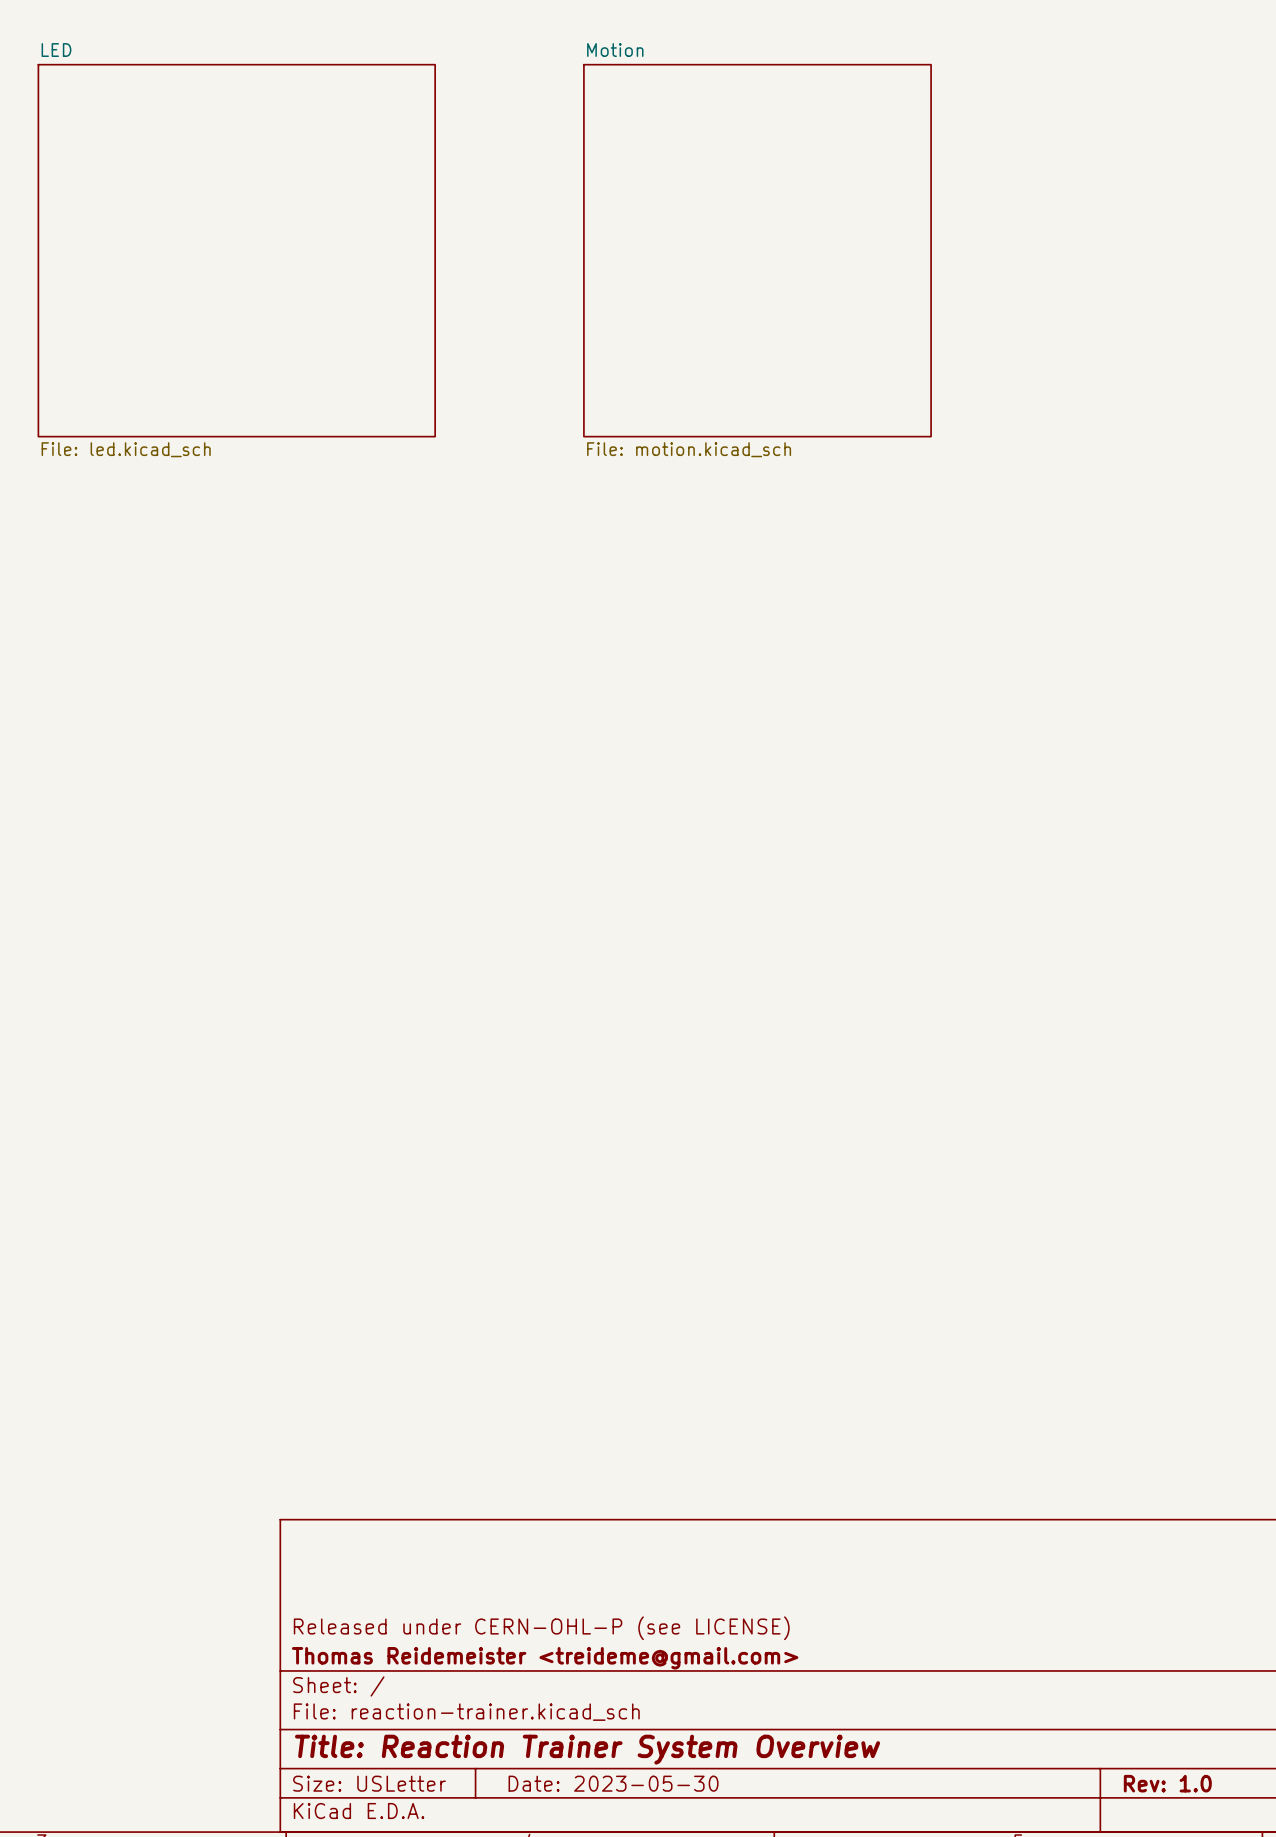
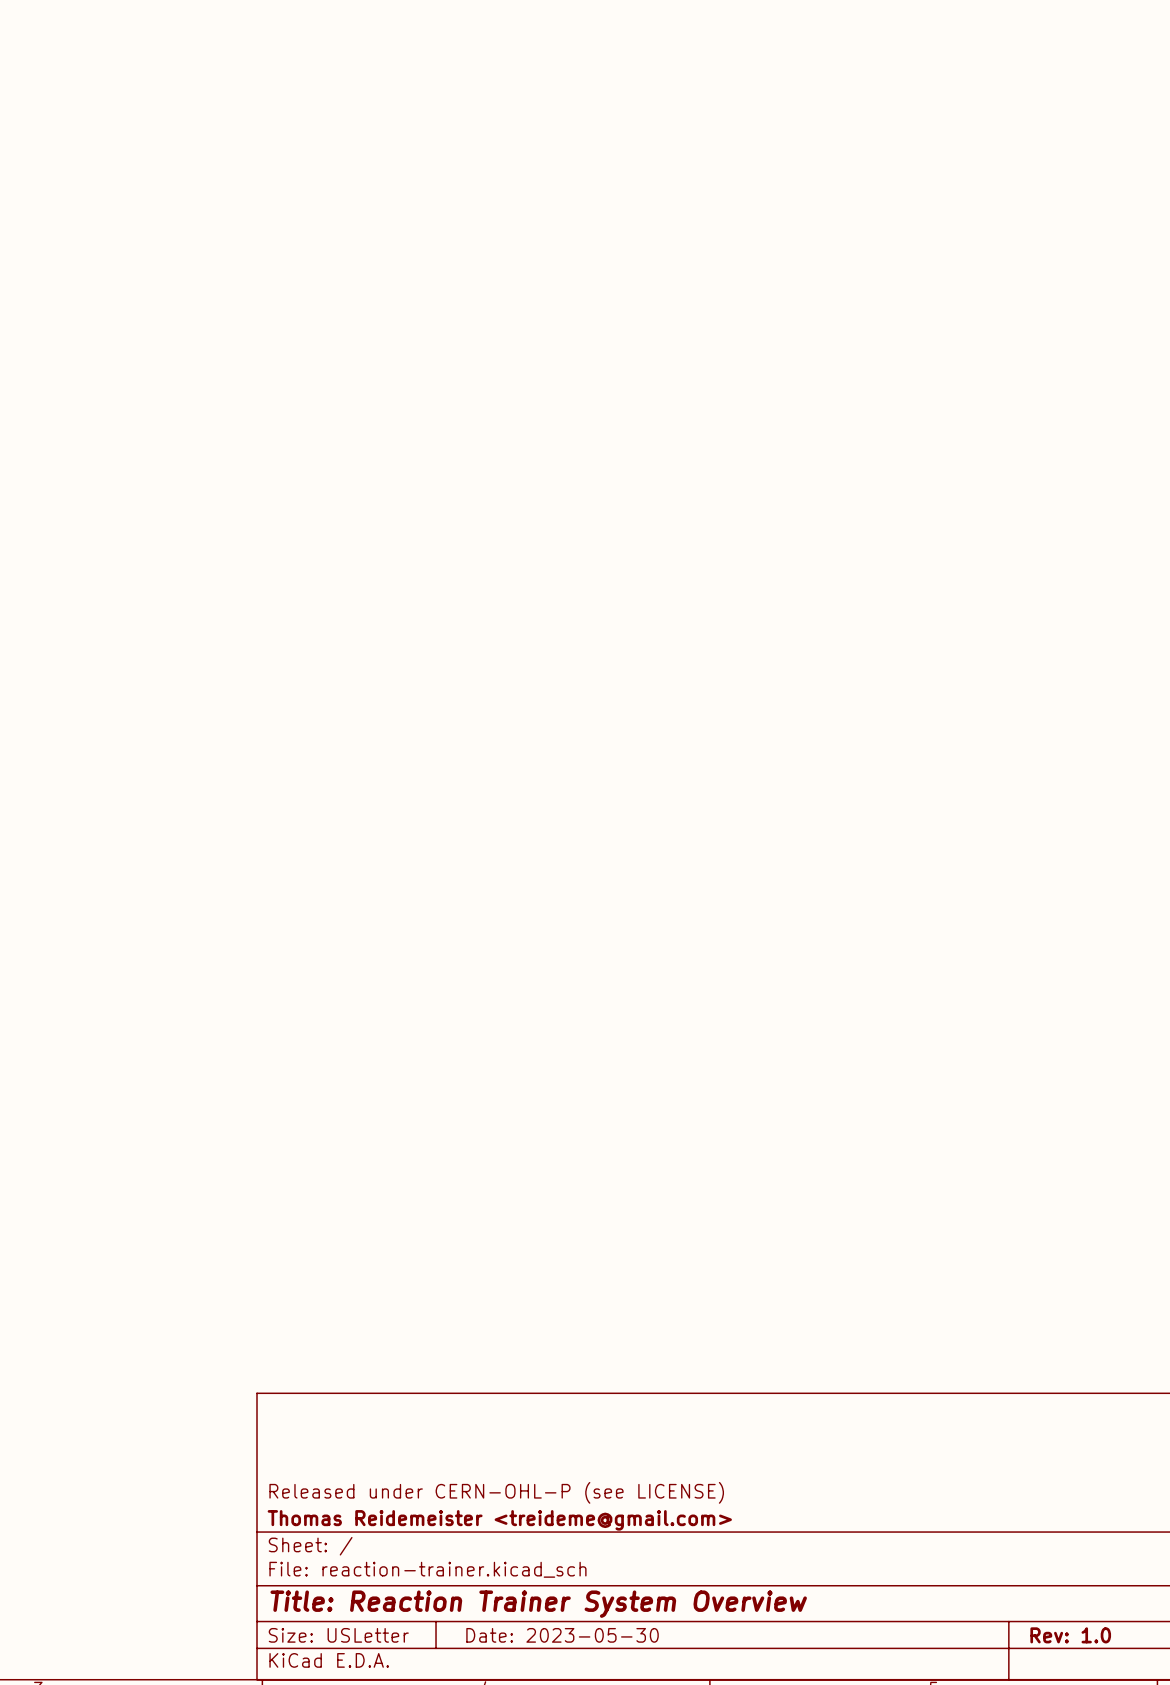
sheet LED: File: led.kicad_sch (236, 250) -> none
sheet Motion: File: motion.kicad_sch (757, 250) -> none

